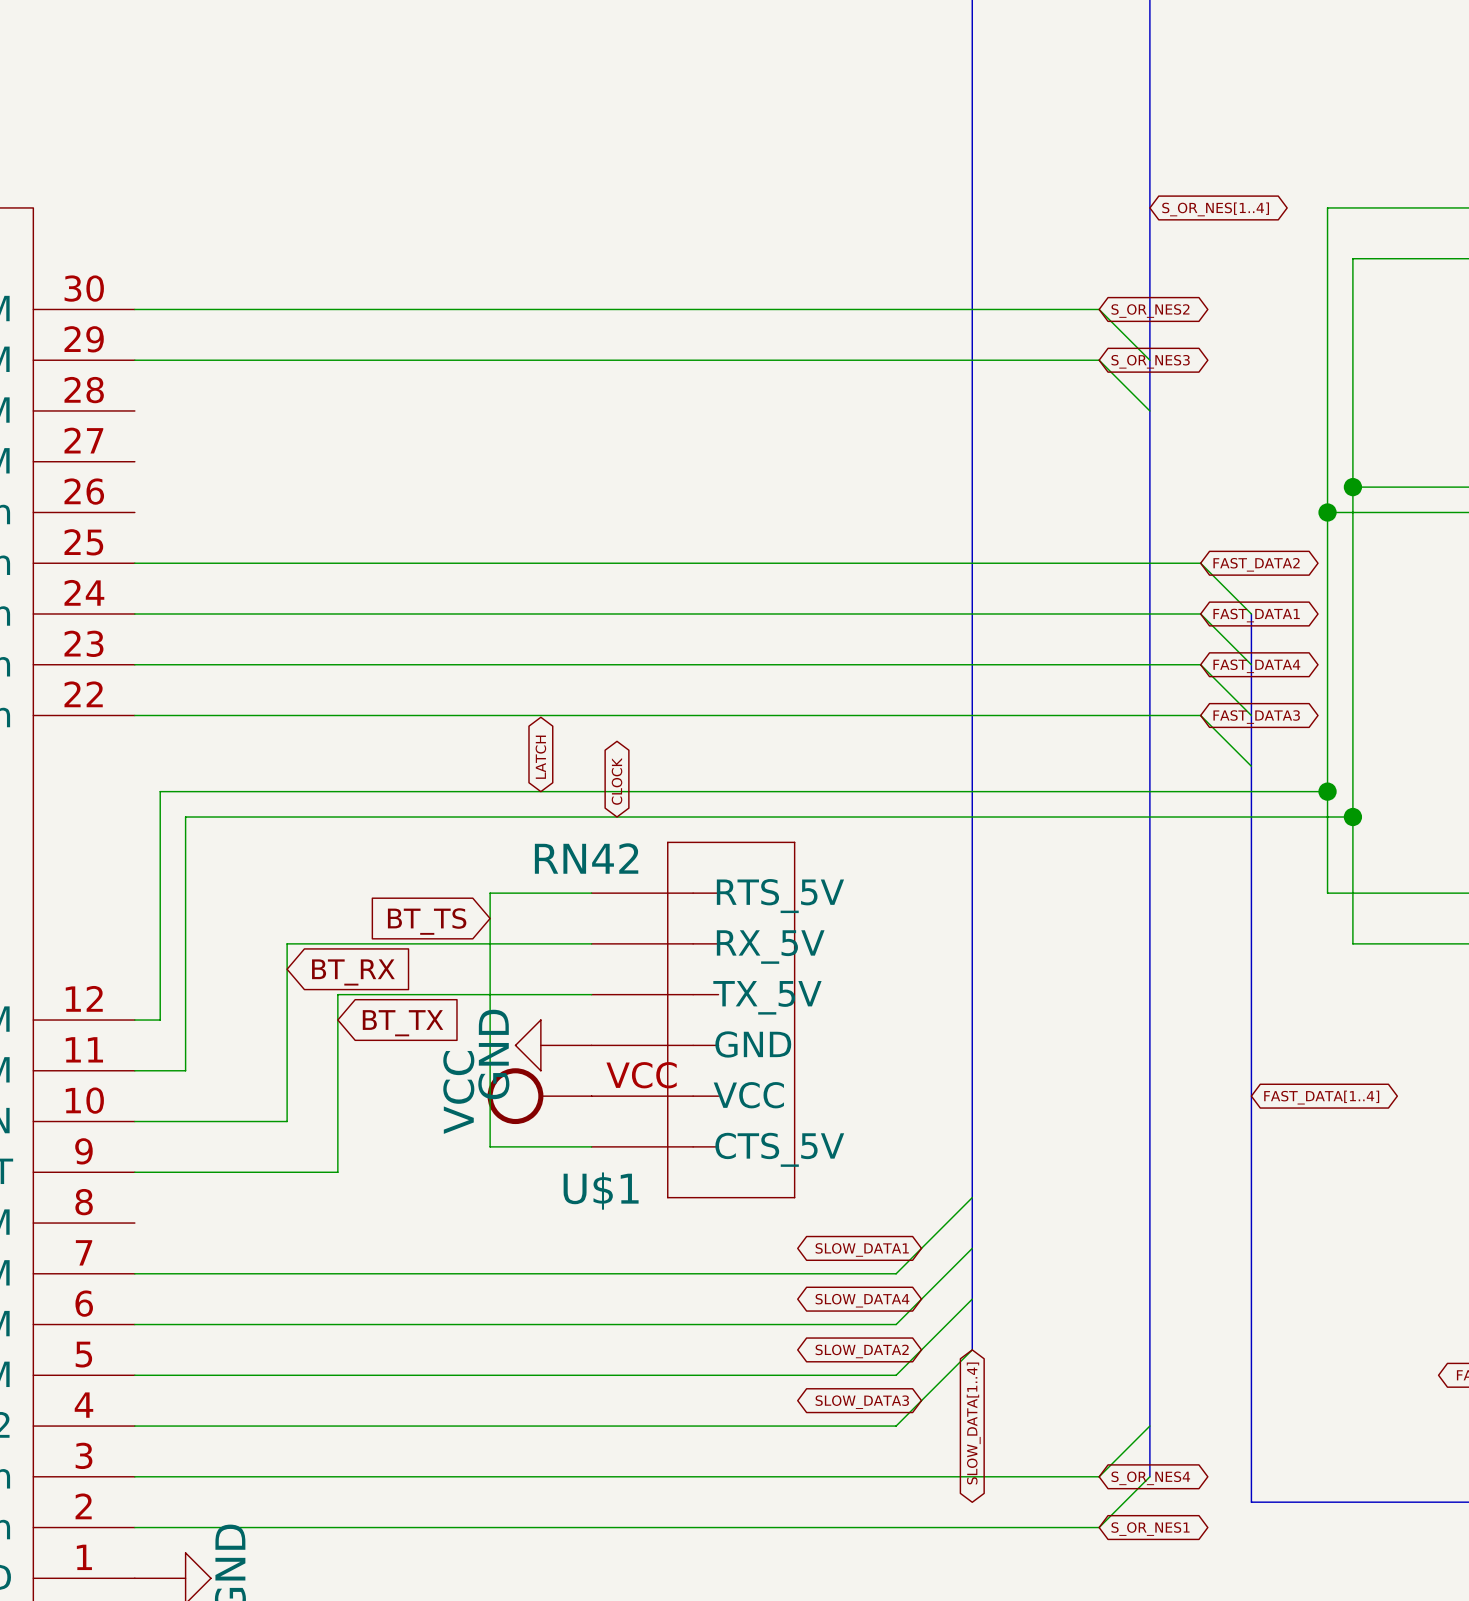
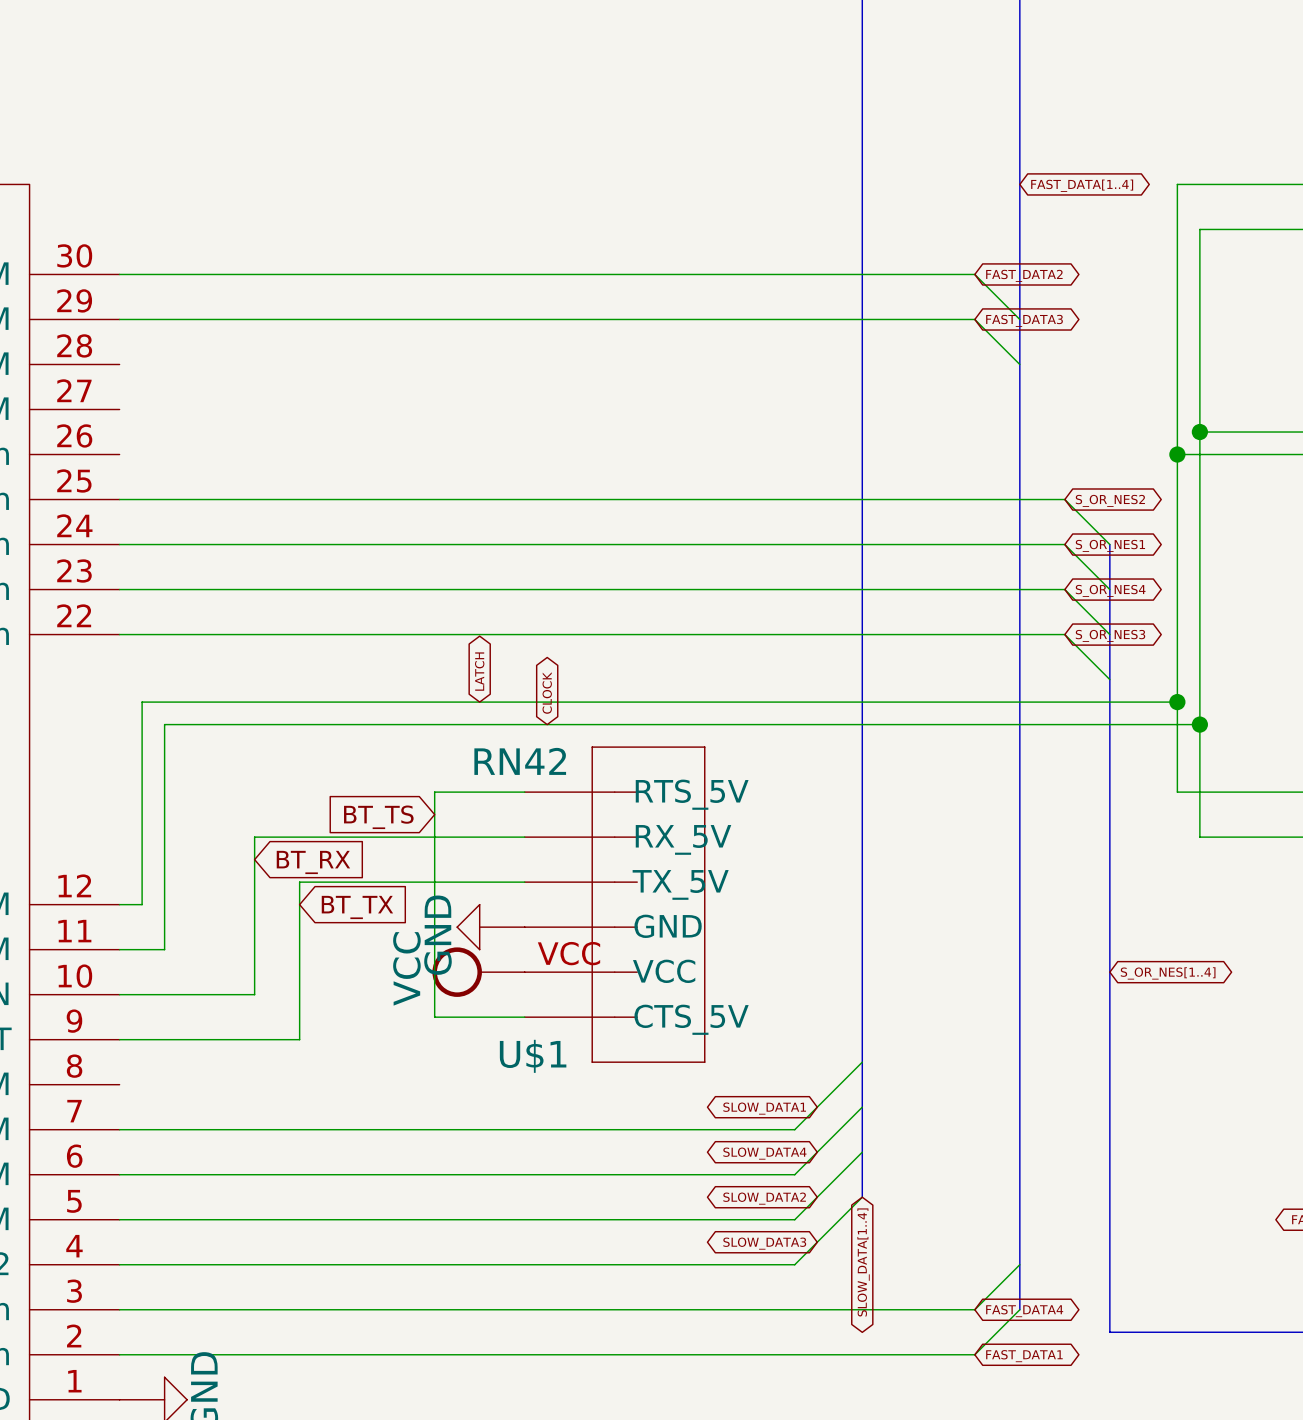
global label: S_OR_NES[1..4] (1215, 209) -> FAST_DATA[1..4] (1082, 185)
global label: S_OR_NES2 (1150, 311) -> FAST_DATA2 (1024, 275)
global label: S_OR_NES3 (1150, 361) -> FAST_DATA3 (1024, 320)
global label: FAST_DATA2 (1256, 564) -> S_OR_NES2 (1110, 500)
global label: FAST_DATA1 (1256, 615) -> S_OR_NES1 (1110, 545)
global label: FAST_DATA4 (1256, 666) -> S_OR_NES4 (1110, 590)
global label: FAST_DATA3 (1256, 717) -> S_OR_NES3 (1110, 635)
global label: FAST_DATA[1..4] (1321, 1097) -> S_OR_NES[1..4] (1168, 973)
global label: S_OR_NES4 (1150, 1478) -> FAST_DATA4 (1024, 1311)
global label: S_OR_NES1 (1150, 1529) -> FAST_DATA1 (1024, 1356)

